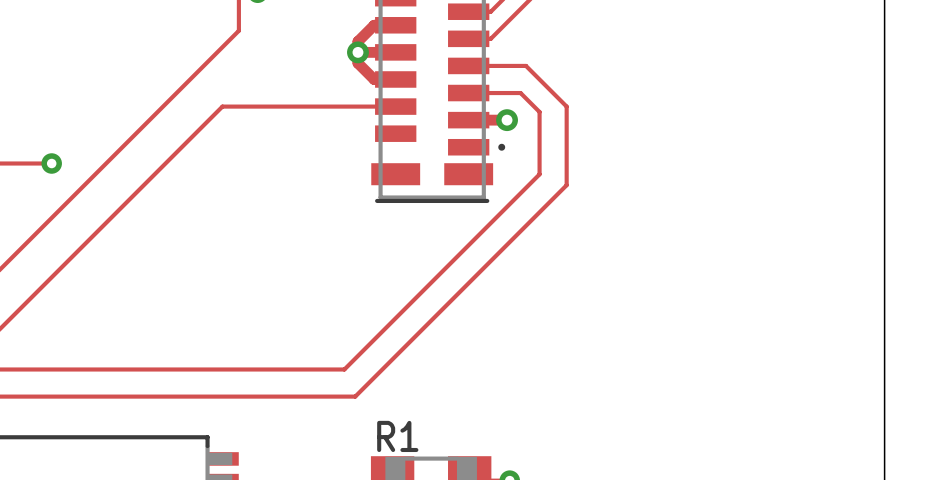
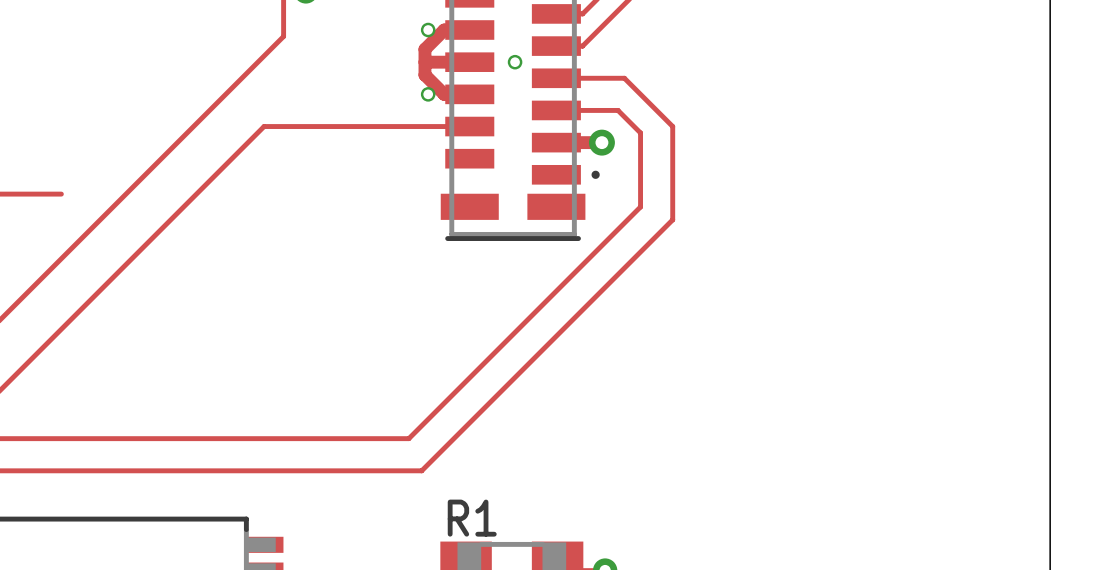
via: none -> (428, 30)
via: (357, 52) -> none
via: none -> (515, 62)
via: none -> (428, 94)
via: (51, 163) -> none

